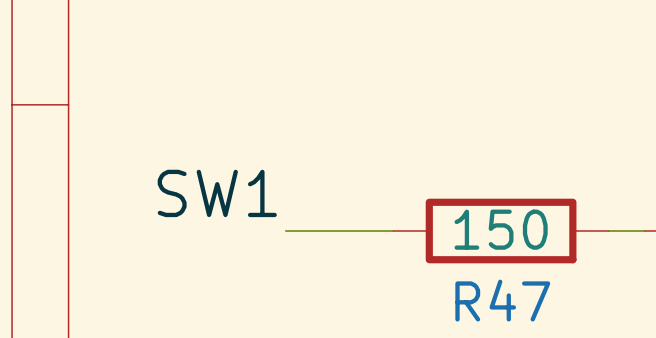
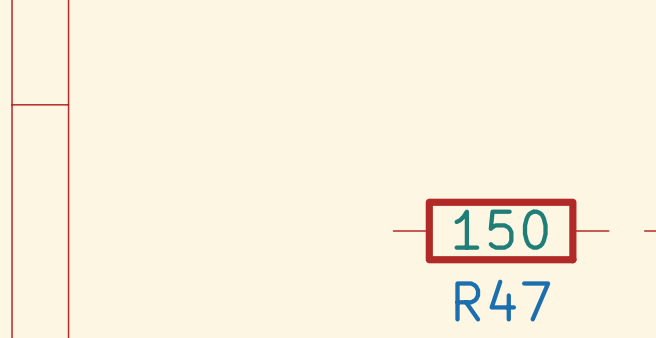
label: SW1 (217, 193) -> none
wire: (285, 231) (393, 231) -> none
wire: (608, 231) (644, 231) -> none

